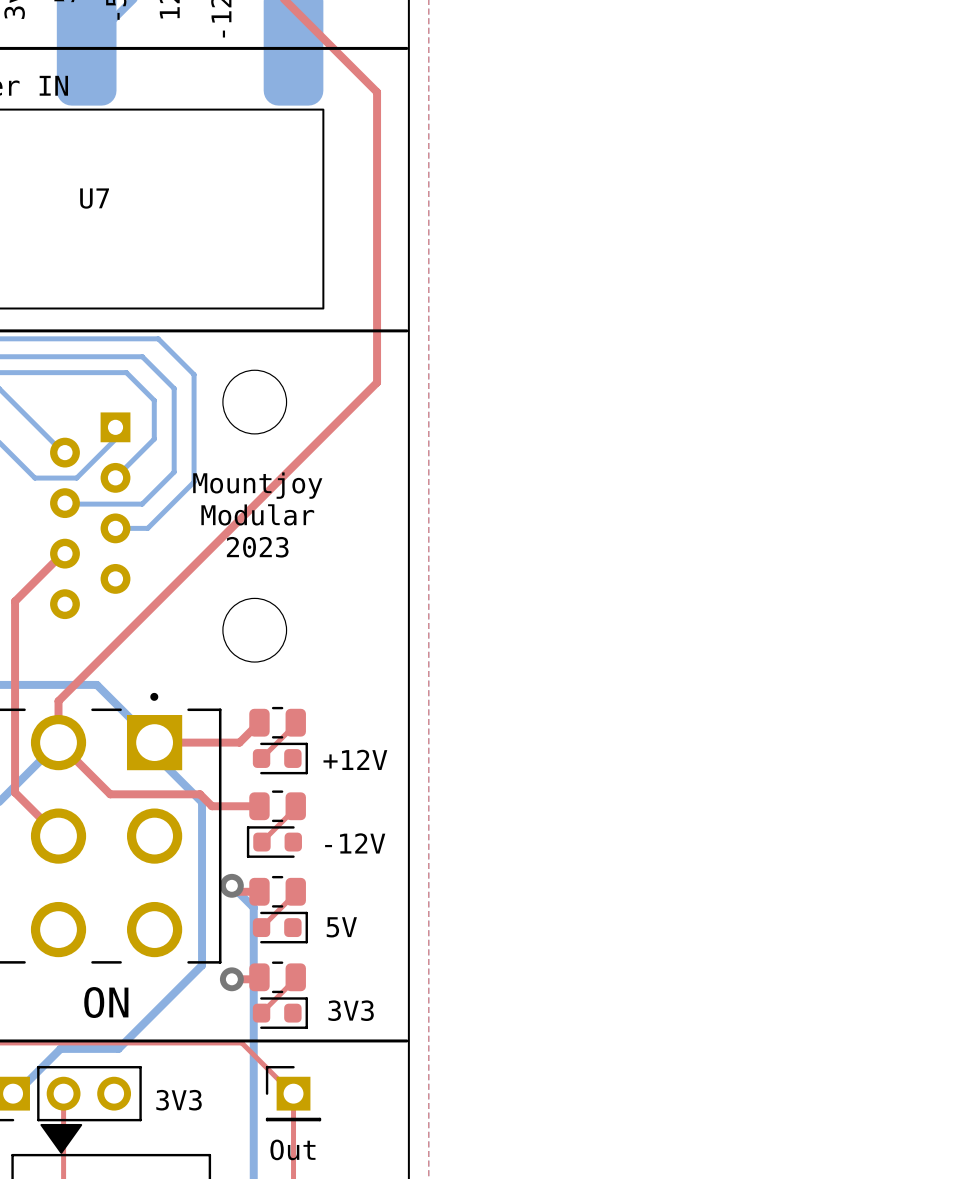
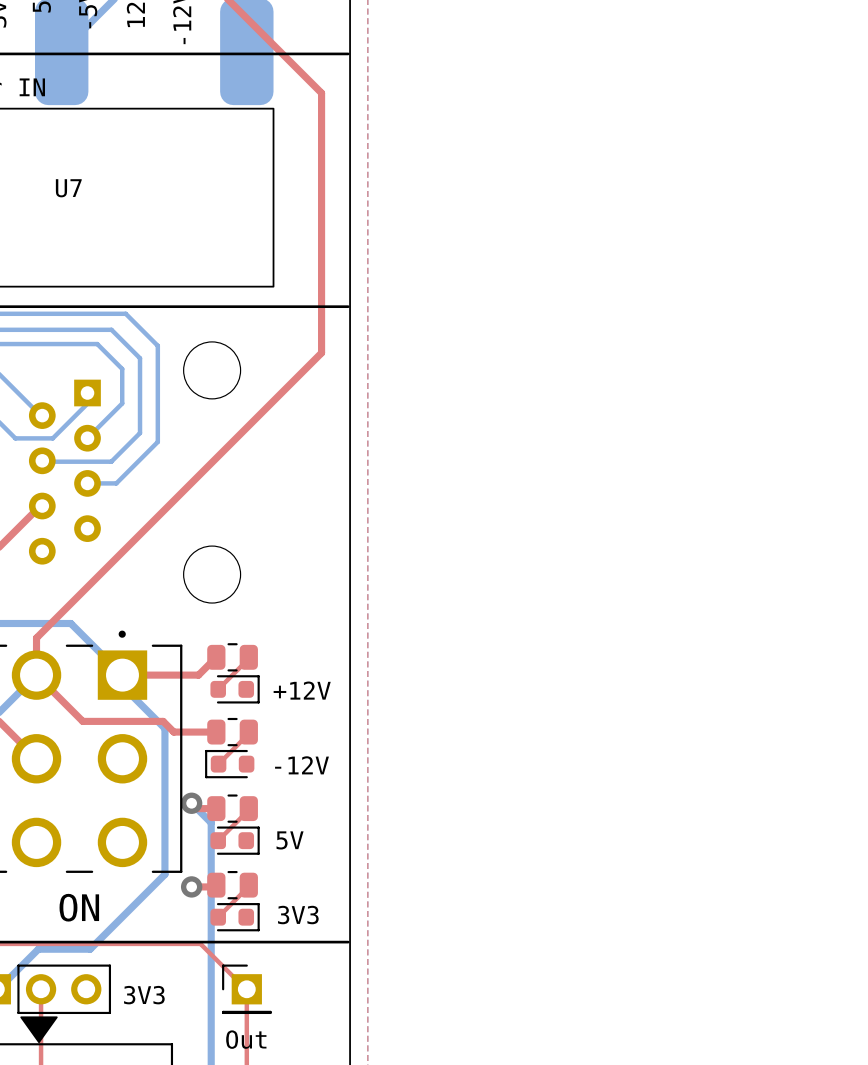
text: Mountjoy (257, 485) -> none
text: Modular (257, 514) -> none
text: 2023 (257, 547) -> none

